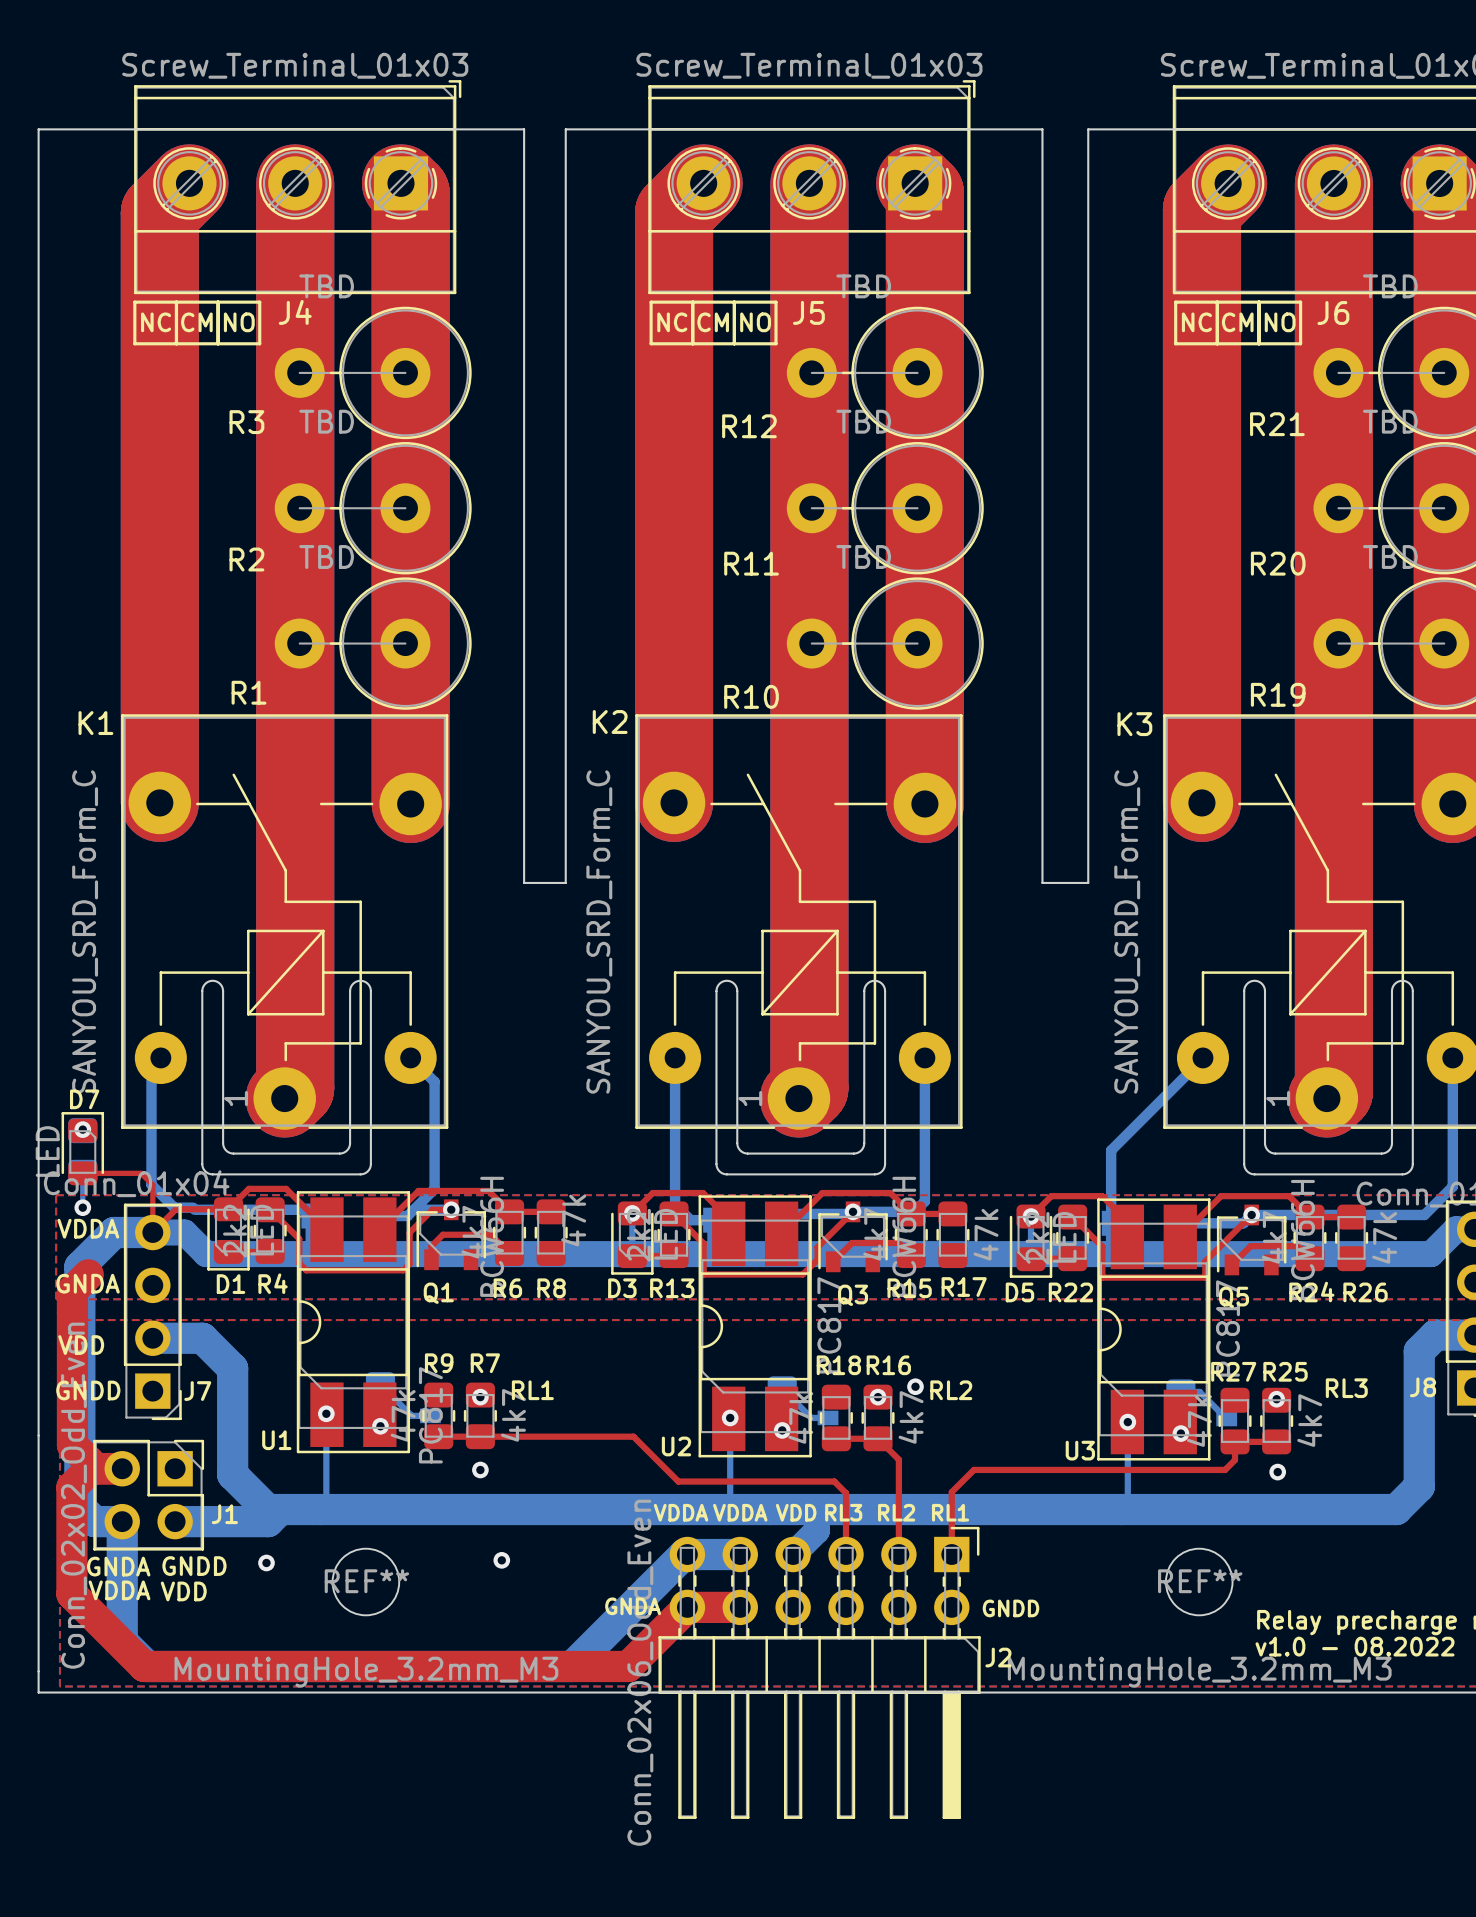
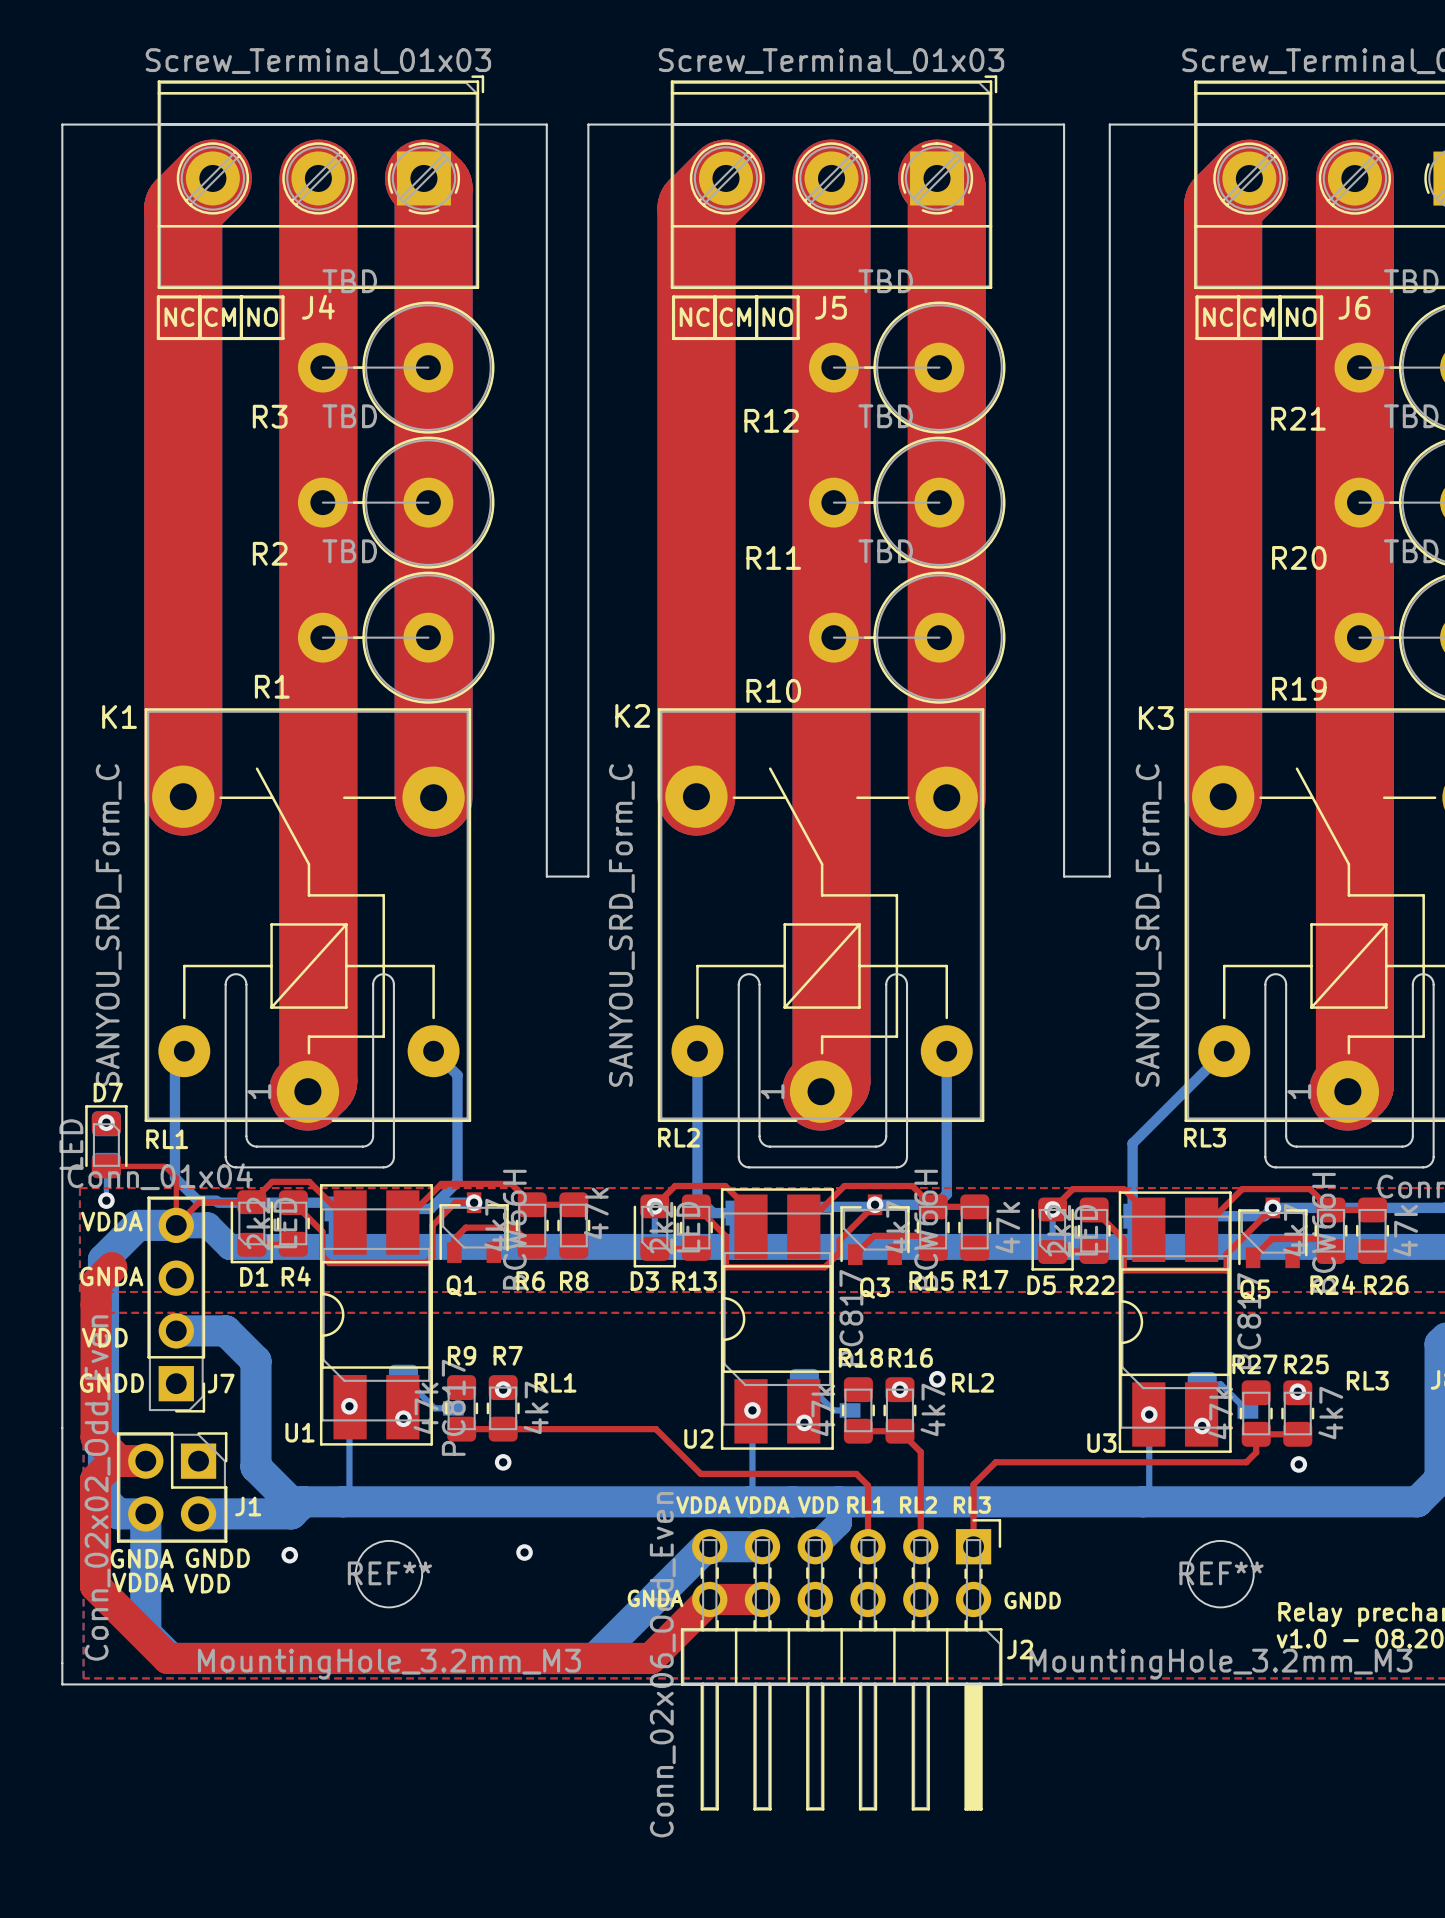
text: none -> RL2 (679, 1137)
text: none -> RL3 (1205, 1137)
text: none -> RL1 (167, 1139)
text: RL3 (843, 1512) -> RL1 (865, 1505)
text: RL1 (950, 1512) -> RL3 (972, 1505)

